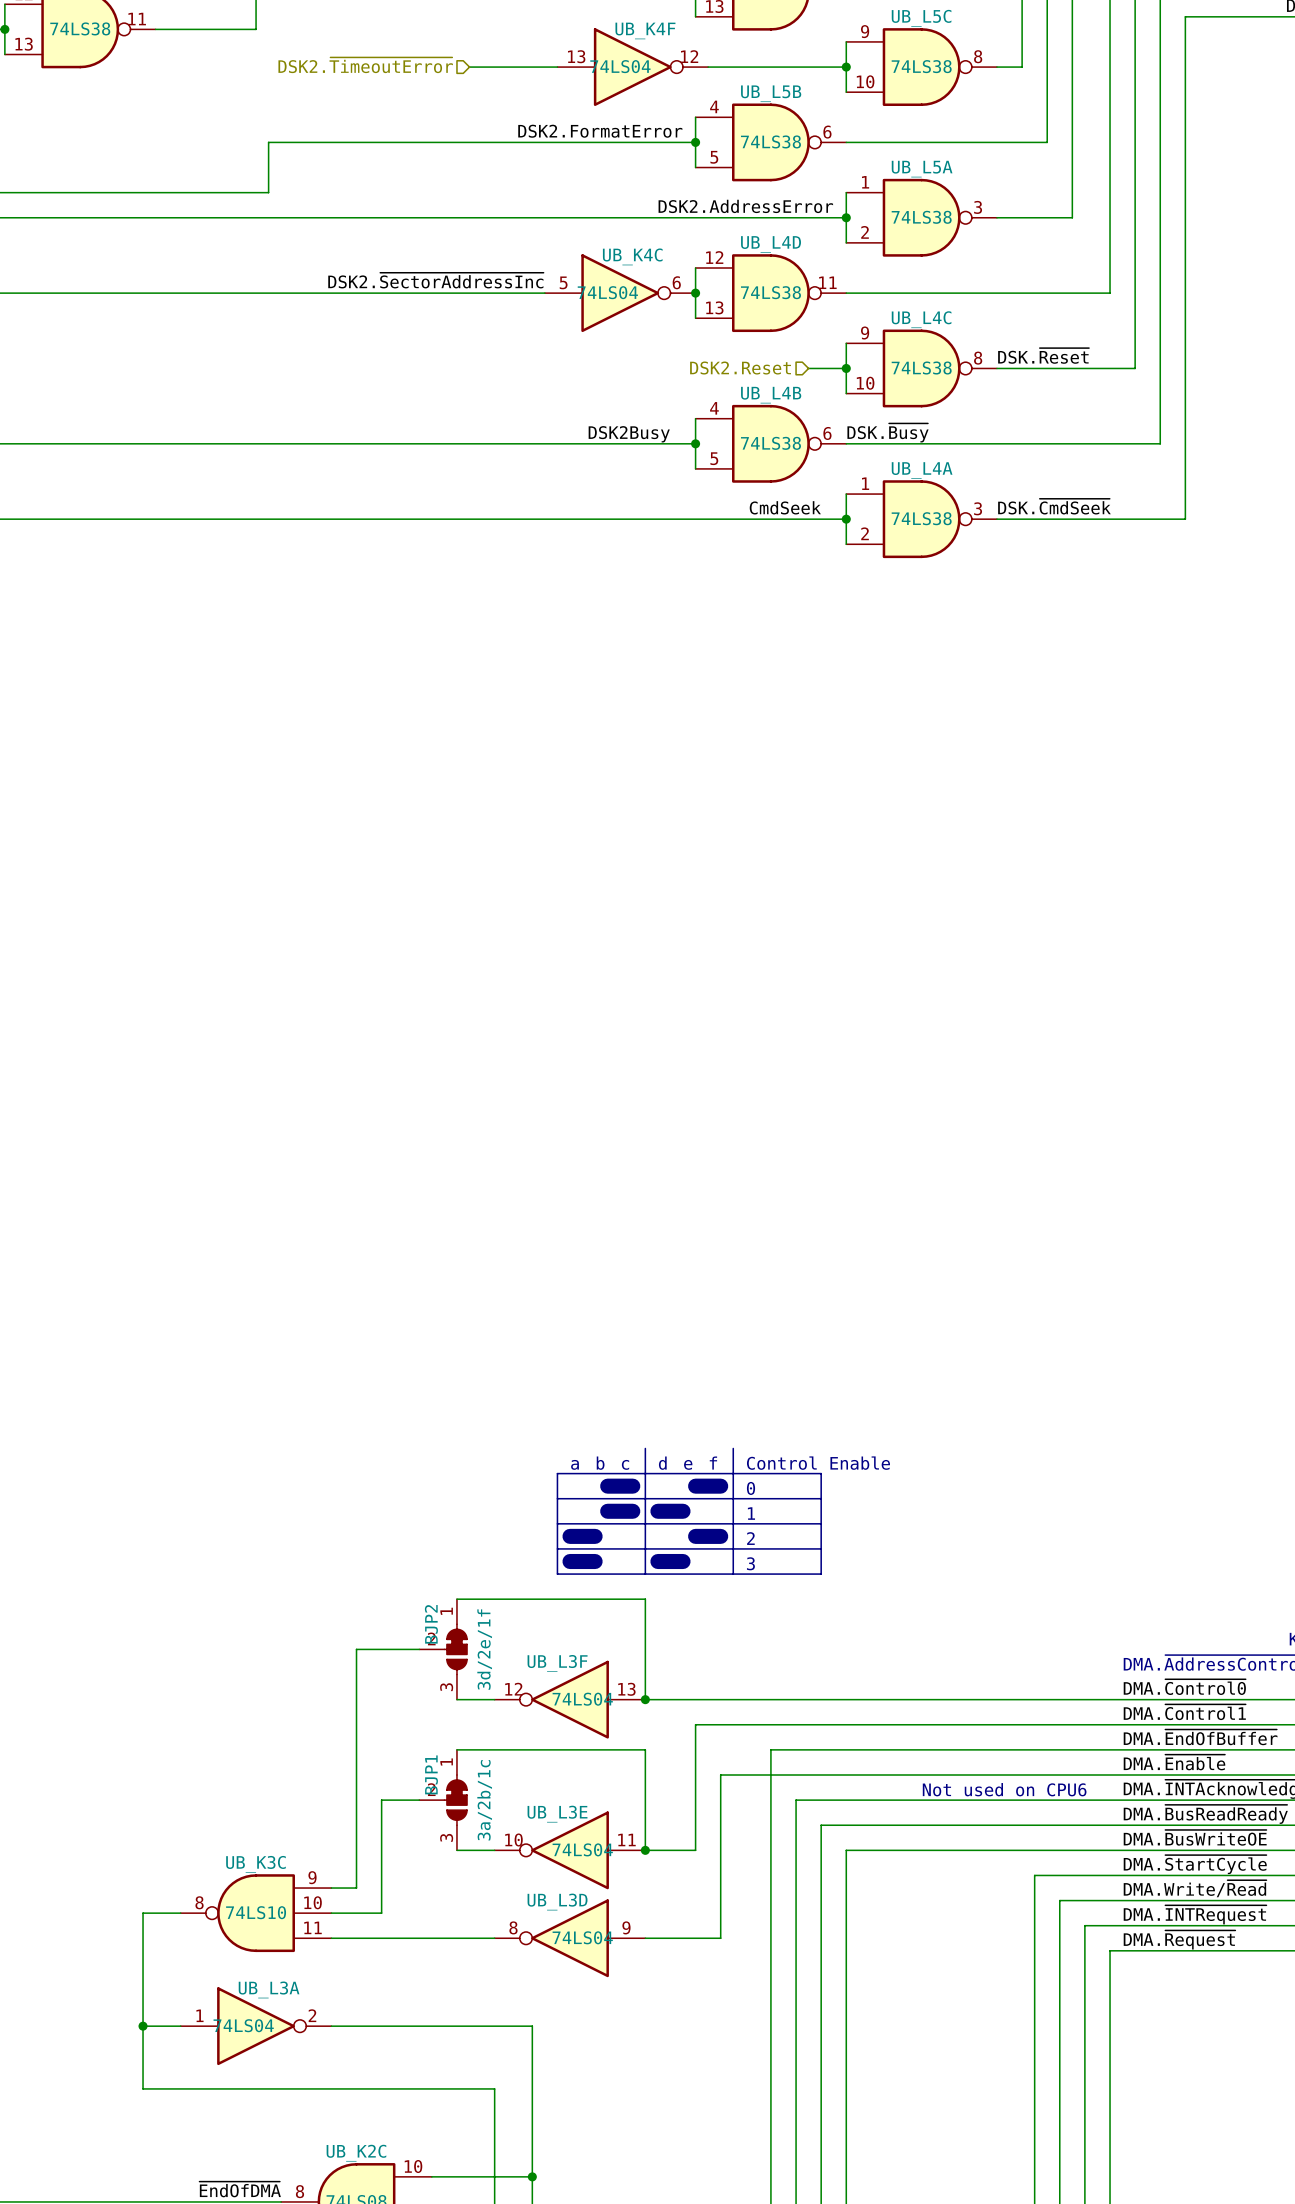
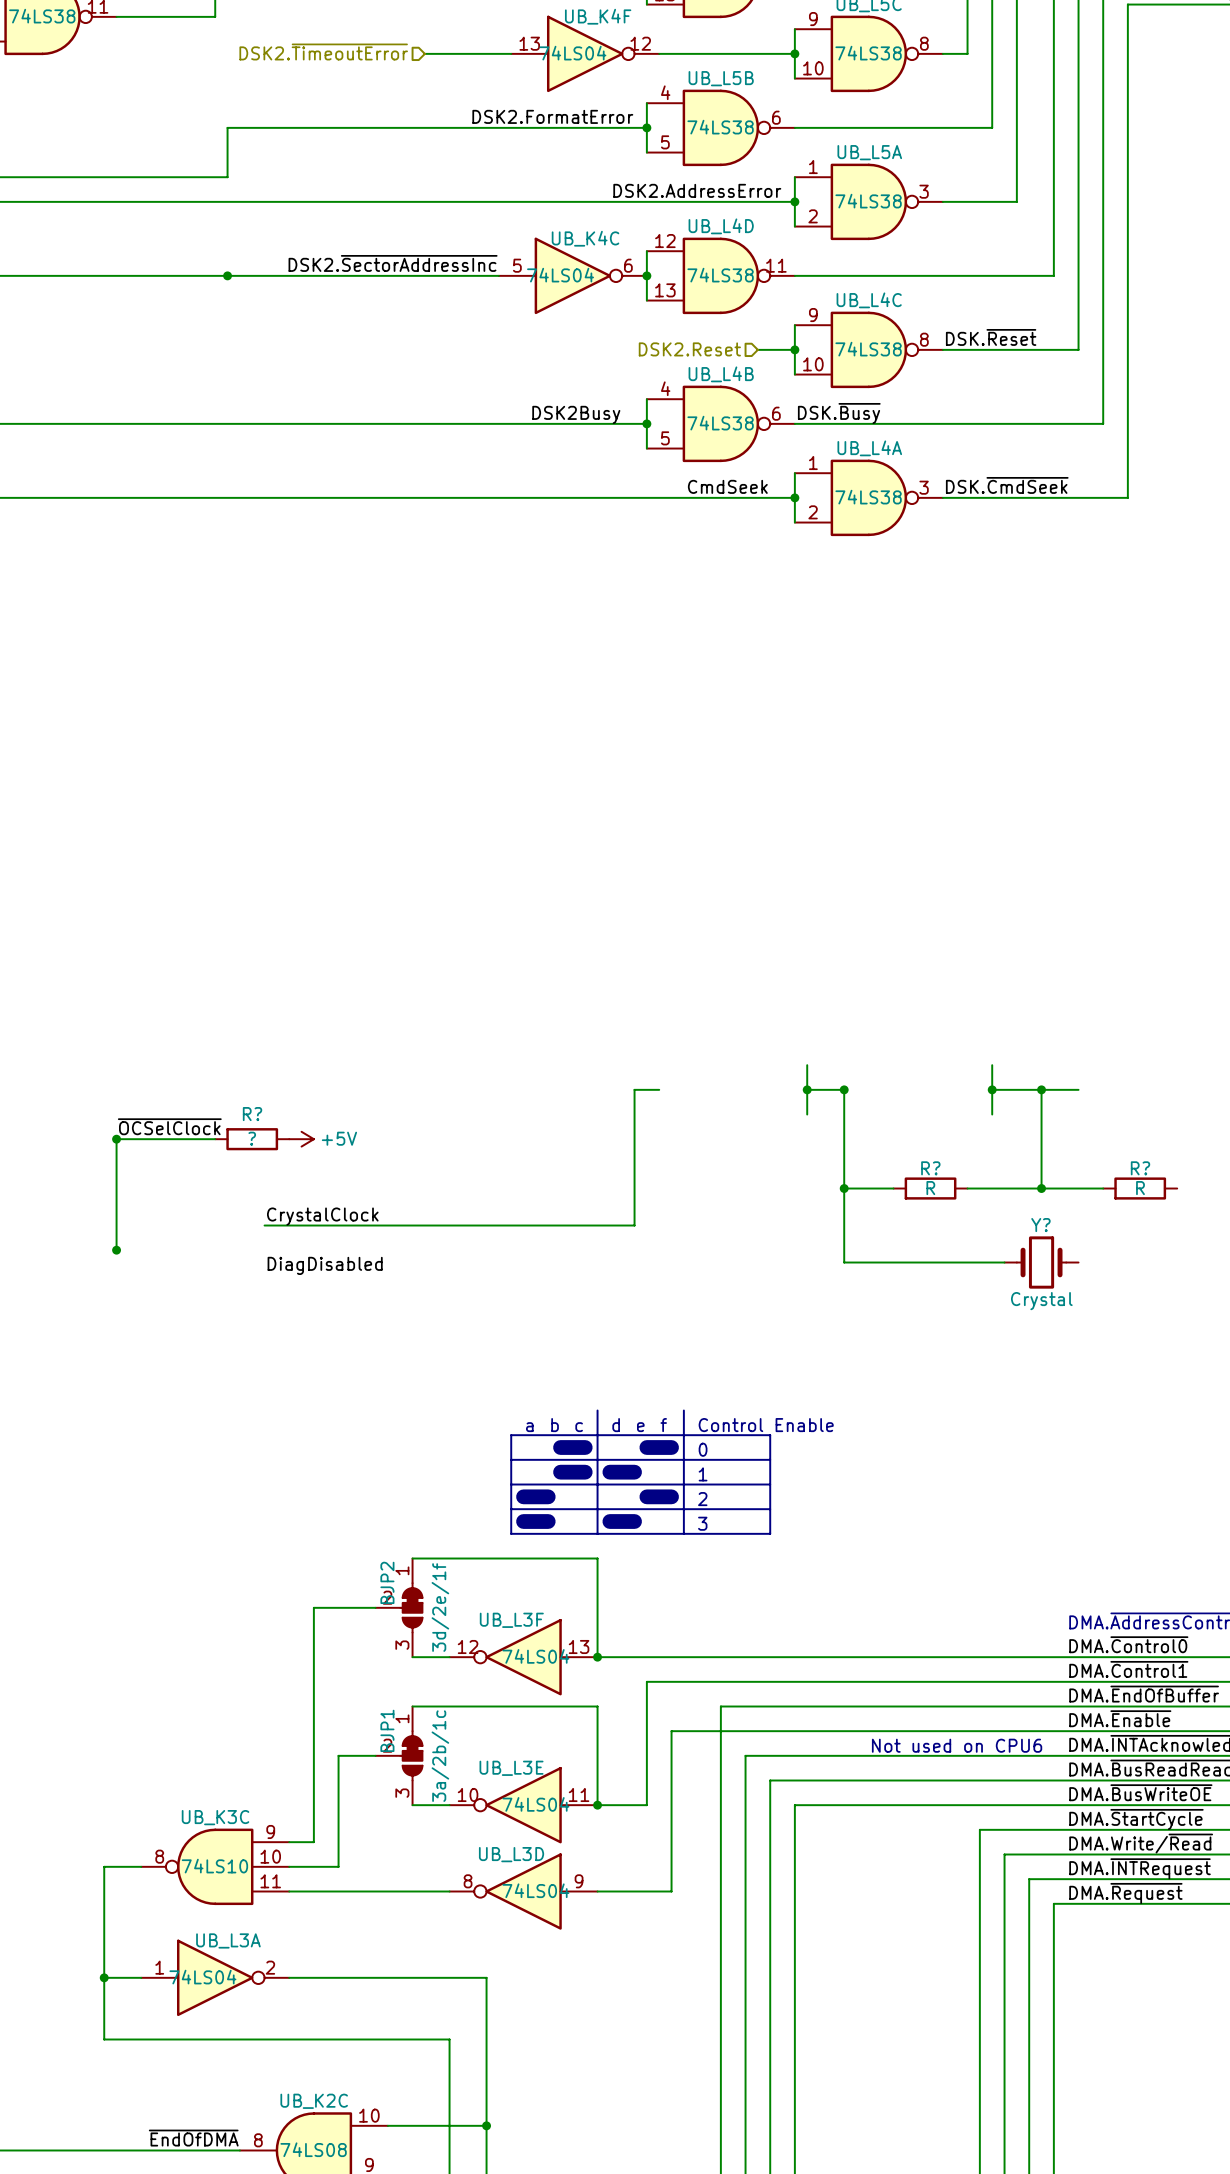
junction: none -> (227, 275)
wire: none -> (807, 1065) (807, 1114)
wire: none -> (992, 1065) (992, 1114)
wire: none -> (659, 1089) (634, 1089) (634, 1225) (264, 1225)
wire: none -> (807, 1089) (844, 1089) (844, 1262) (1004, 1262)
junction: none -> (807, 1089)
junction: none -> (844, 1089)
wire: none -> (992, 1089) (1078, 1089)
junction: none -> (992, 1089)
wire: none -> (1041, 1089) (1041, 1188)
junction: none -> (1041, 1089)
label: none -> ~{OCSelClock} (169, 1126)
junction: none -> (116, 1139)
wire: none -> (215, 1139) (116, 1139) (116, 1250)
R?: none -> ? (252, 1139)
power symbol: none -> +5V (301, 1139)
wire: none -> (844, 1188) (893, 1188)
junction: none -> (844, 1188)
R?: none -> R (930, 1188)
wire: none -> (967, 1188) (1103, 1188)
junction: none -> (1041, 1188)
R?: none -> R (1140, 1188)
label: none -> CrystalClock (322, 1216)
junction: none -> (116, 1250)
Y?: none -> Crystal (1041, 1262)
label: none -> DiagDisabled (325, 1265)

